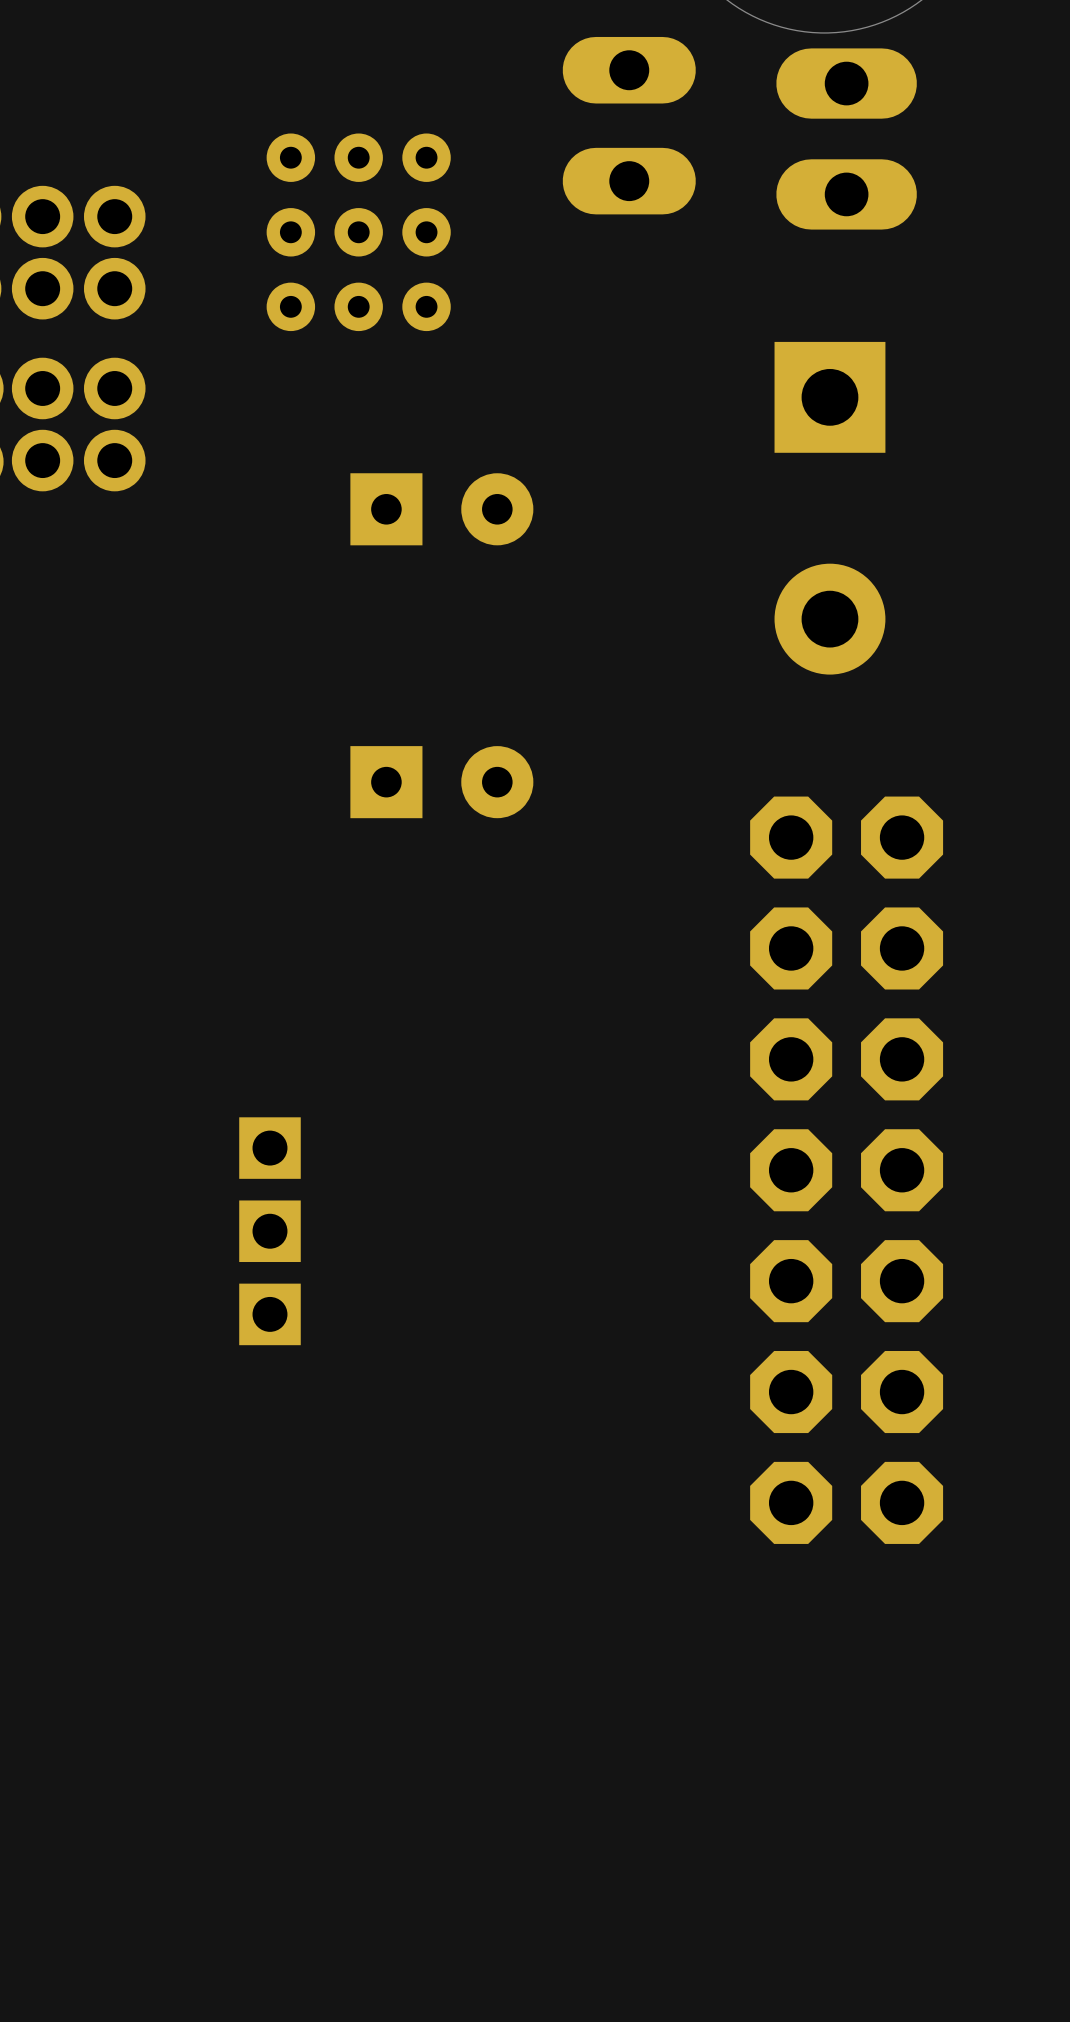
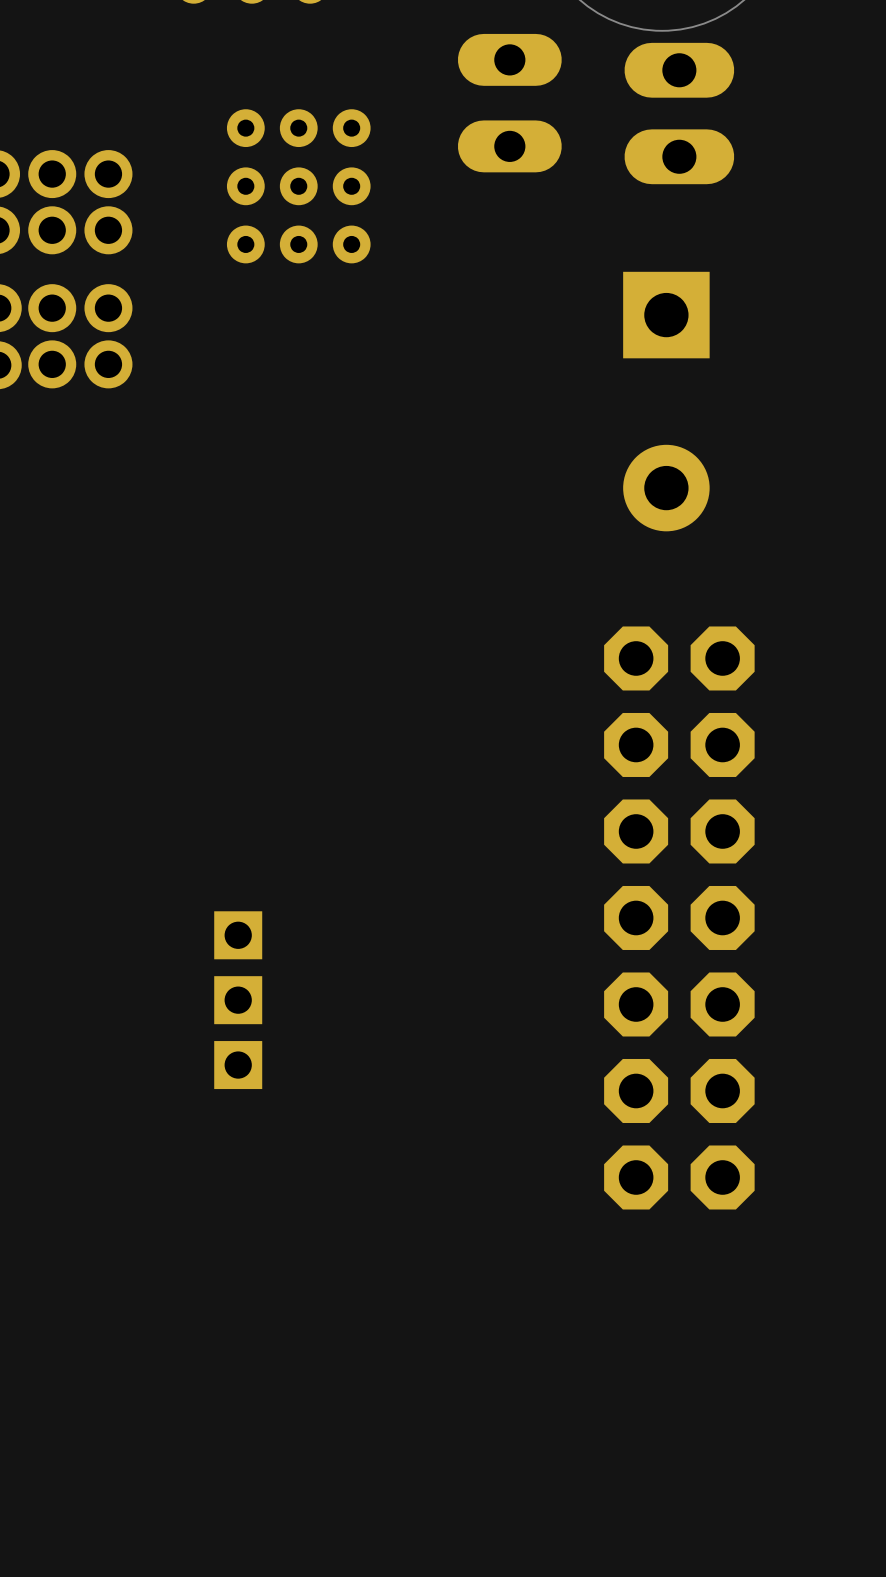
part: (441, 509) -> none
part: (441, 782) -> none
part position: (269, 1231) -> (238, 1000)

